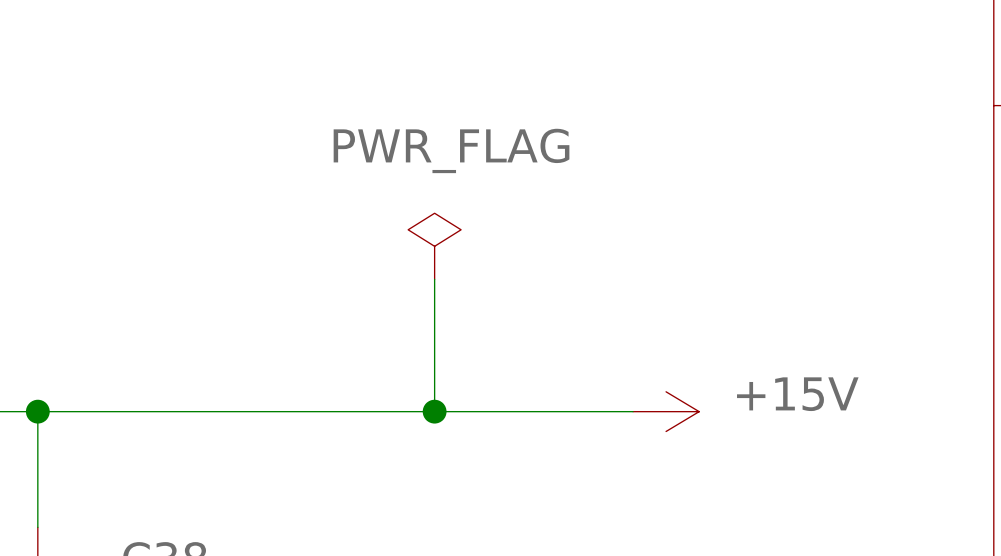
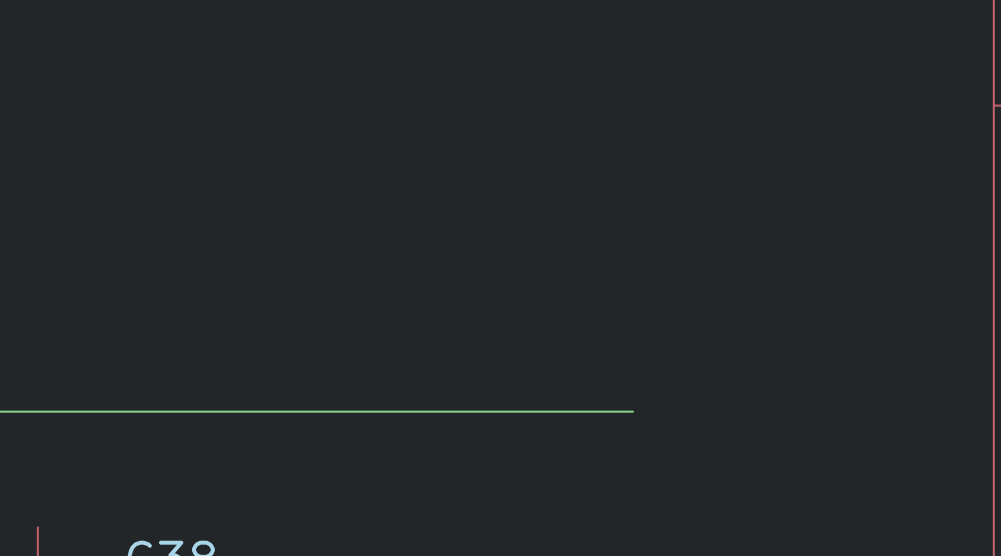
power symbol: PWR_FLAG (434, 246) -> none
wire: (434, 279) (434, 411) -> none
wire: (37, 411) (37, 527) -> none
junction: (37, 411) -> none
junction: (434, 411) -> none
power symbol: +15V (666, 411) -> none

